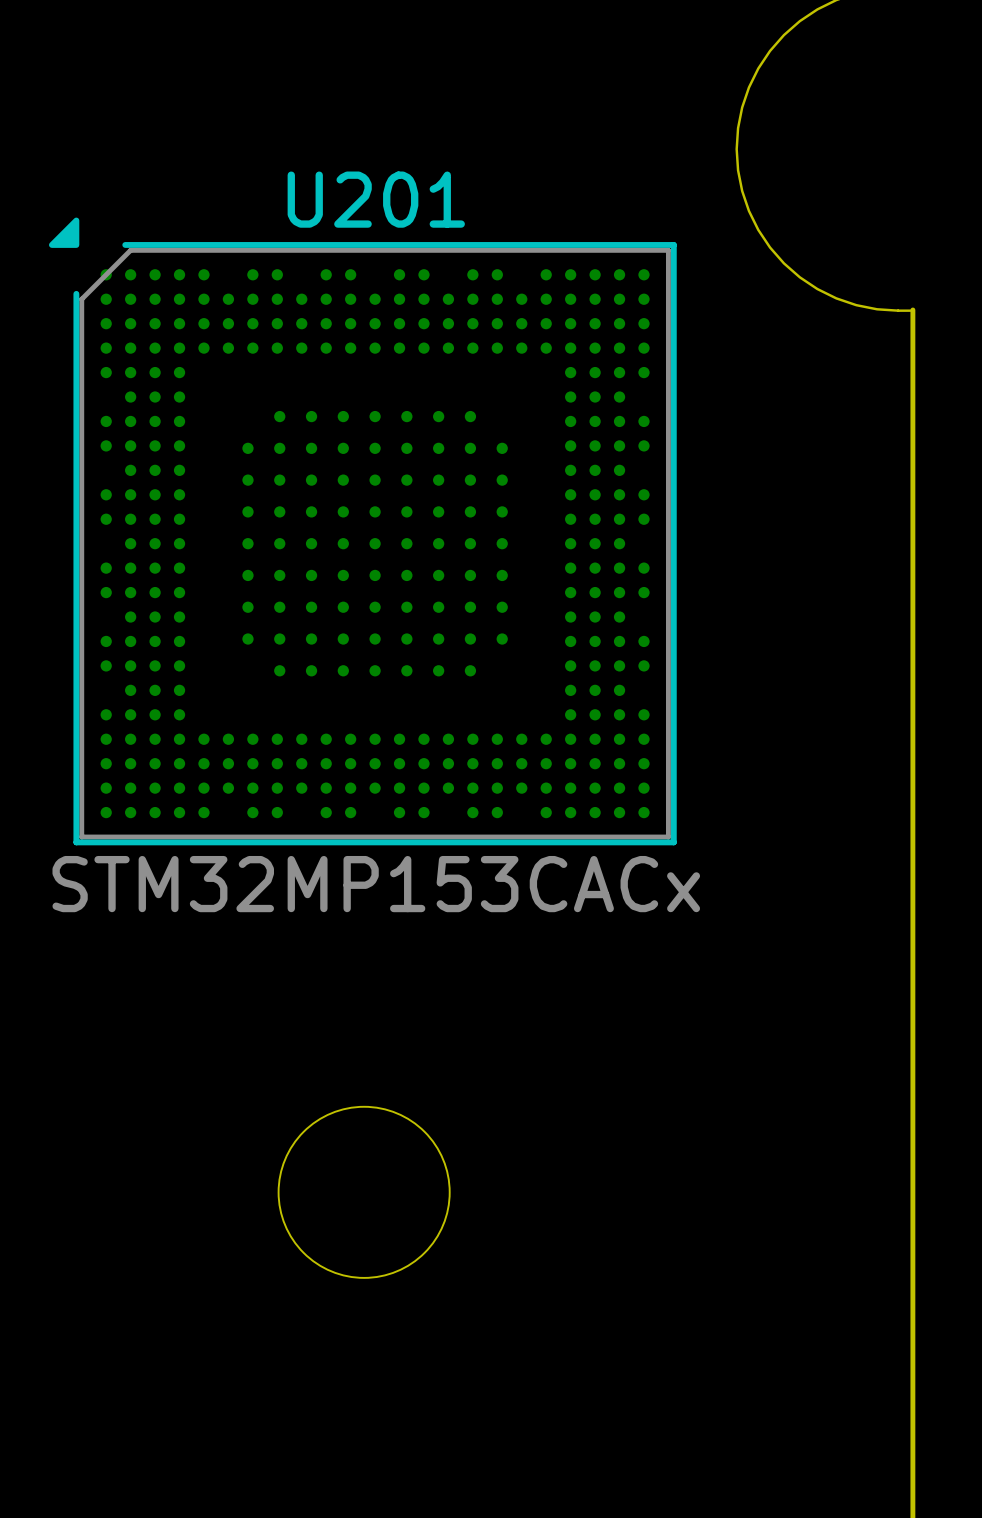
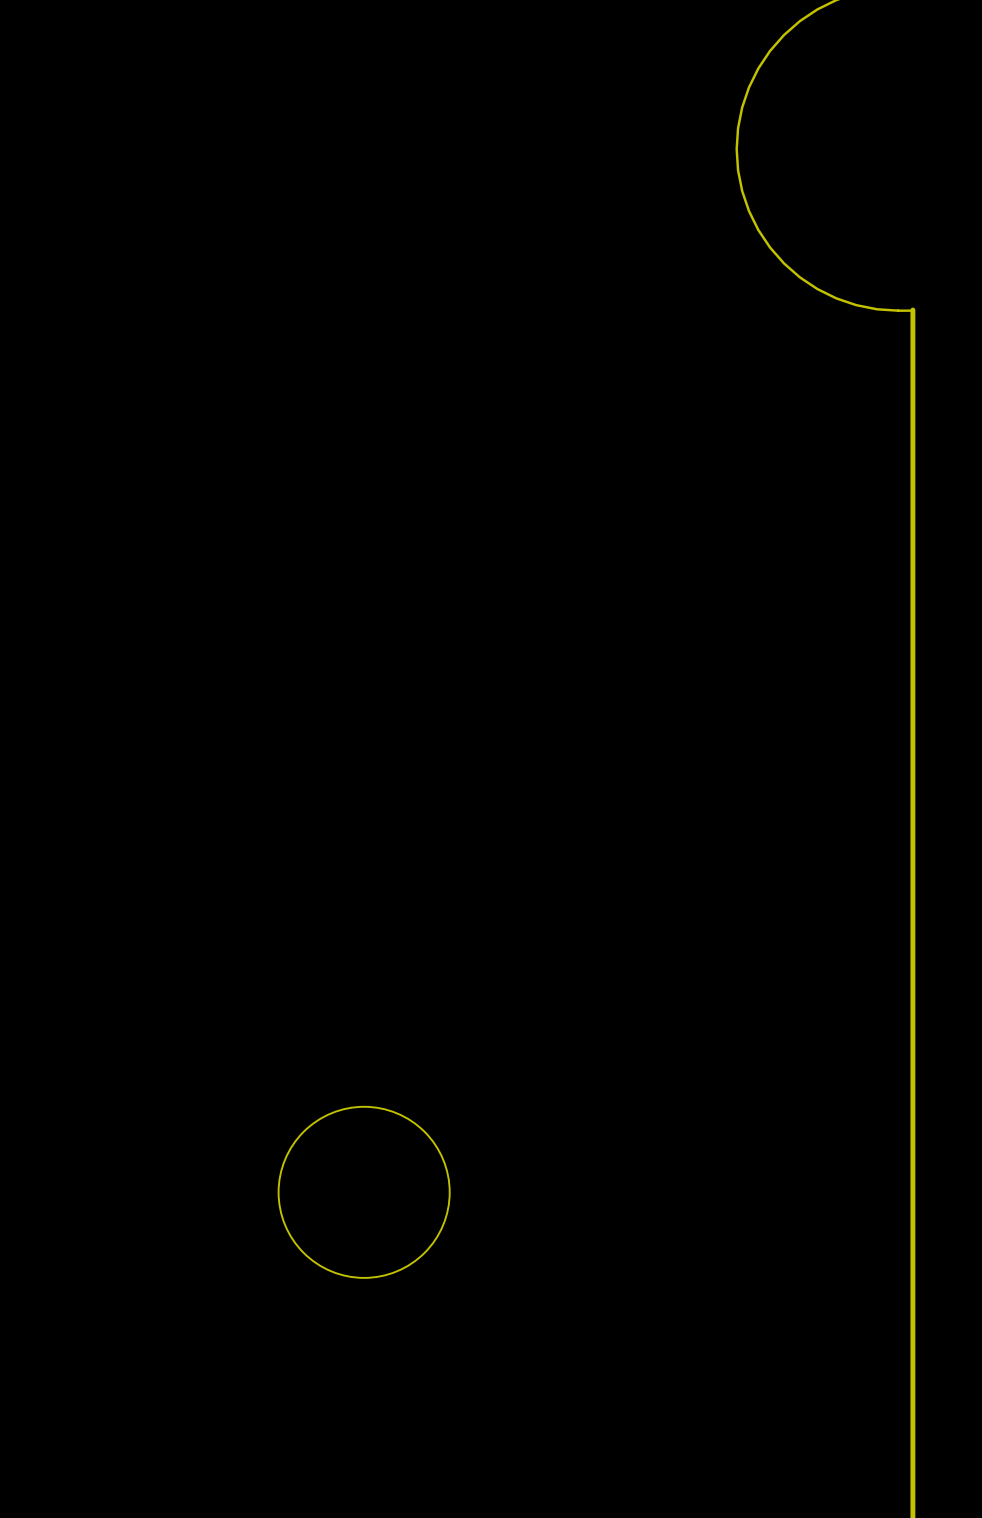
U201: STM32MP153CACx (362, 531) -> none

